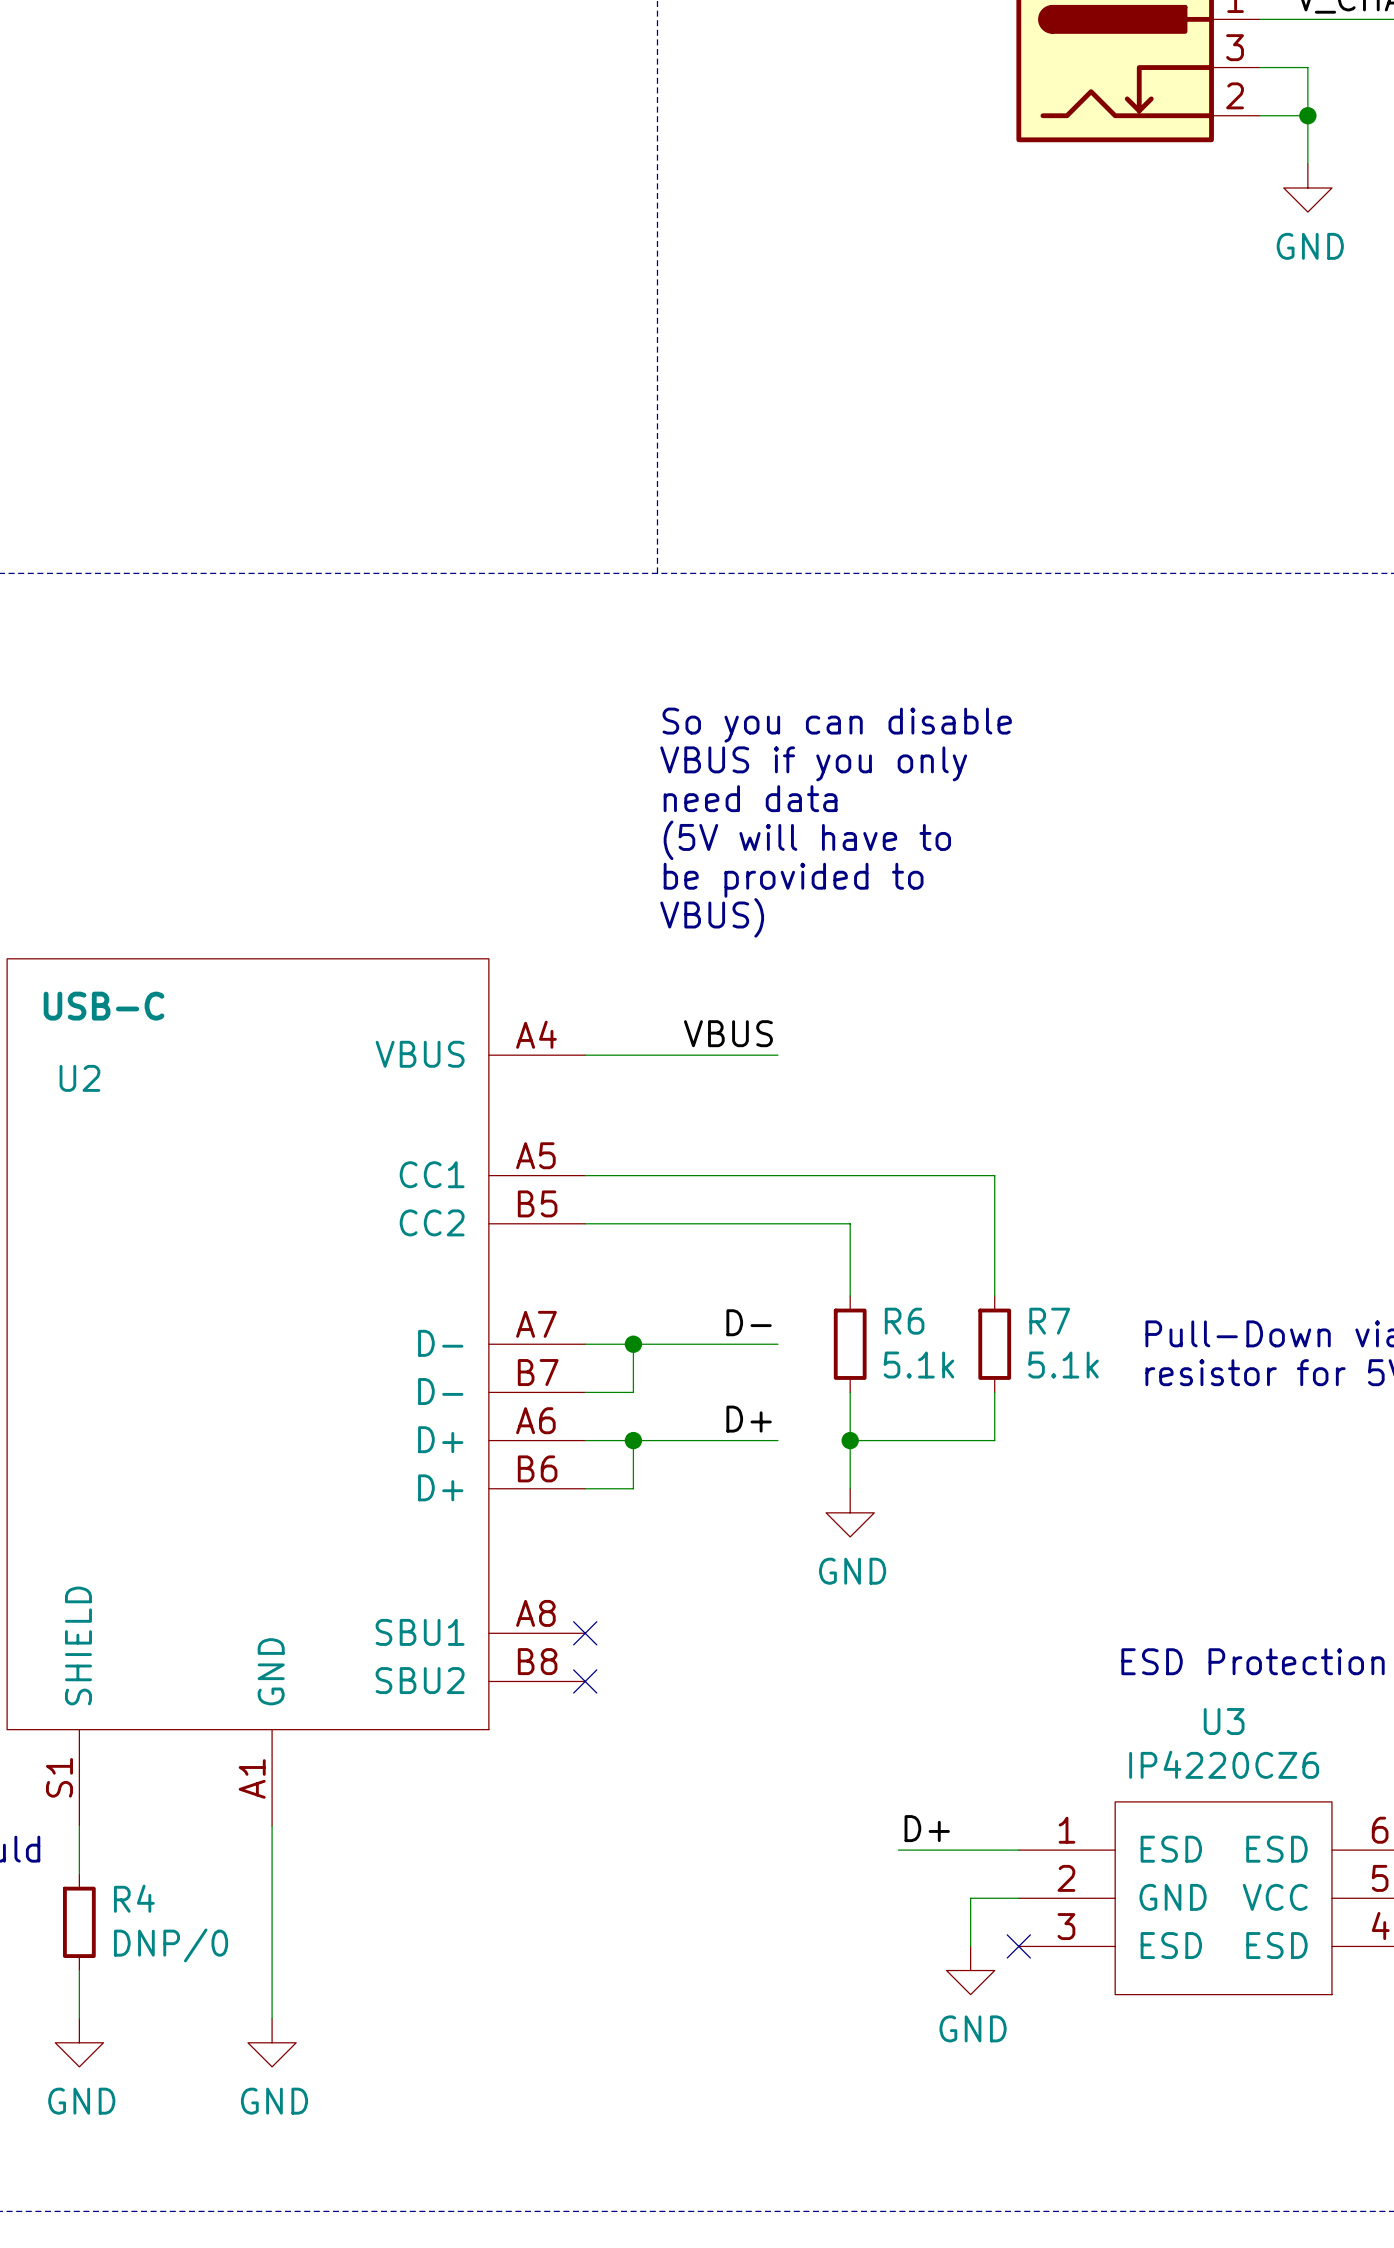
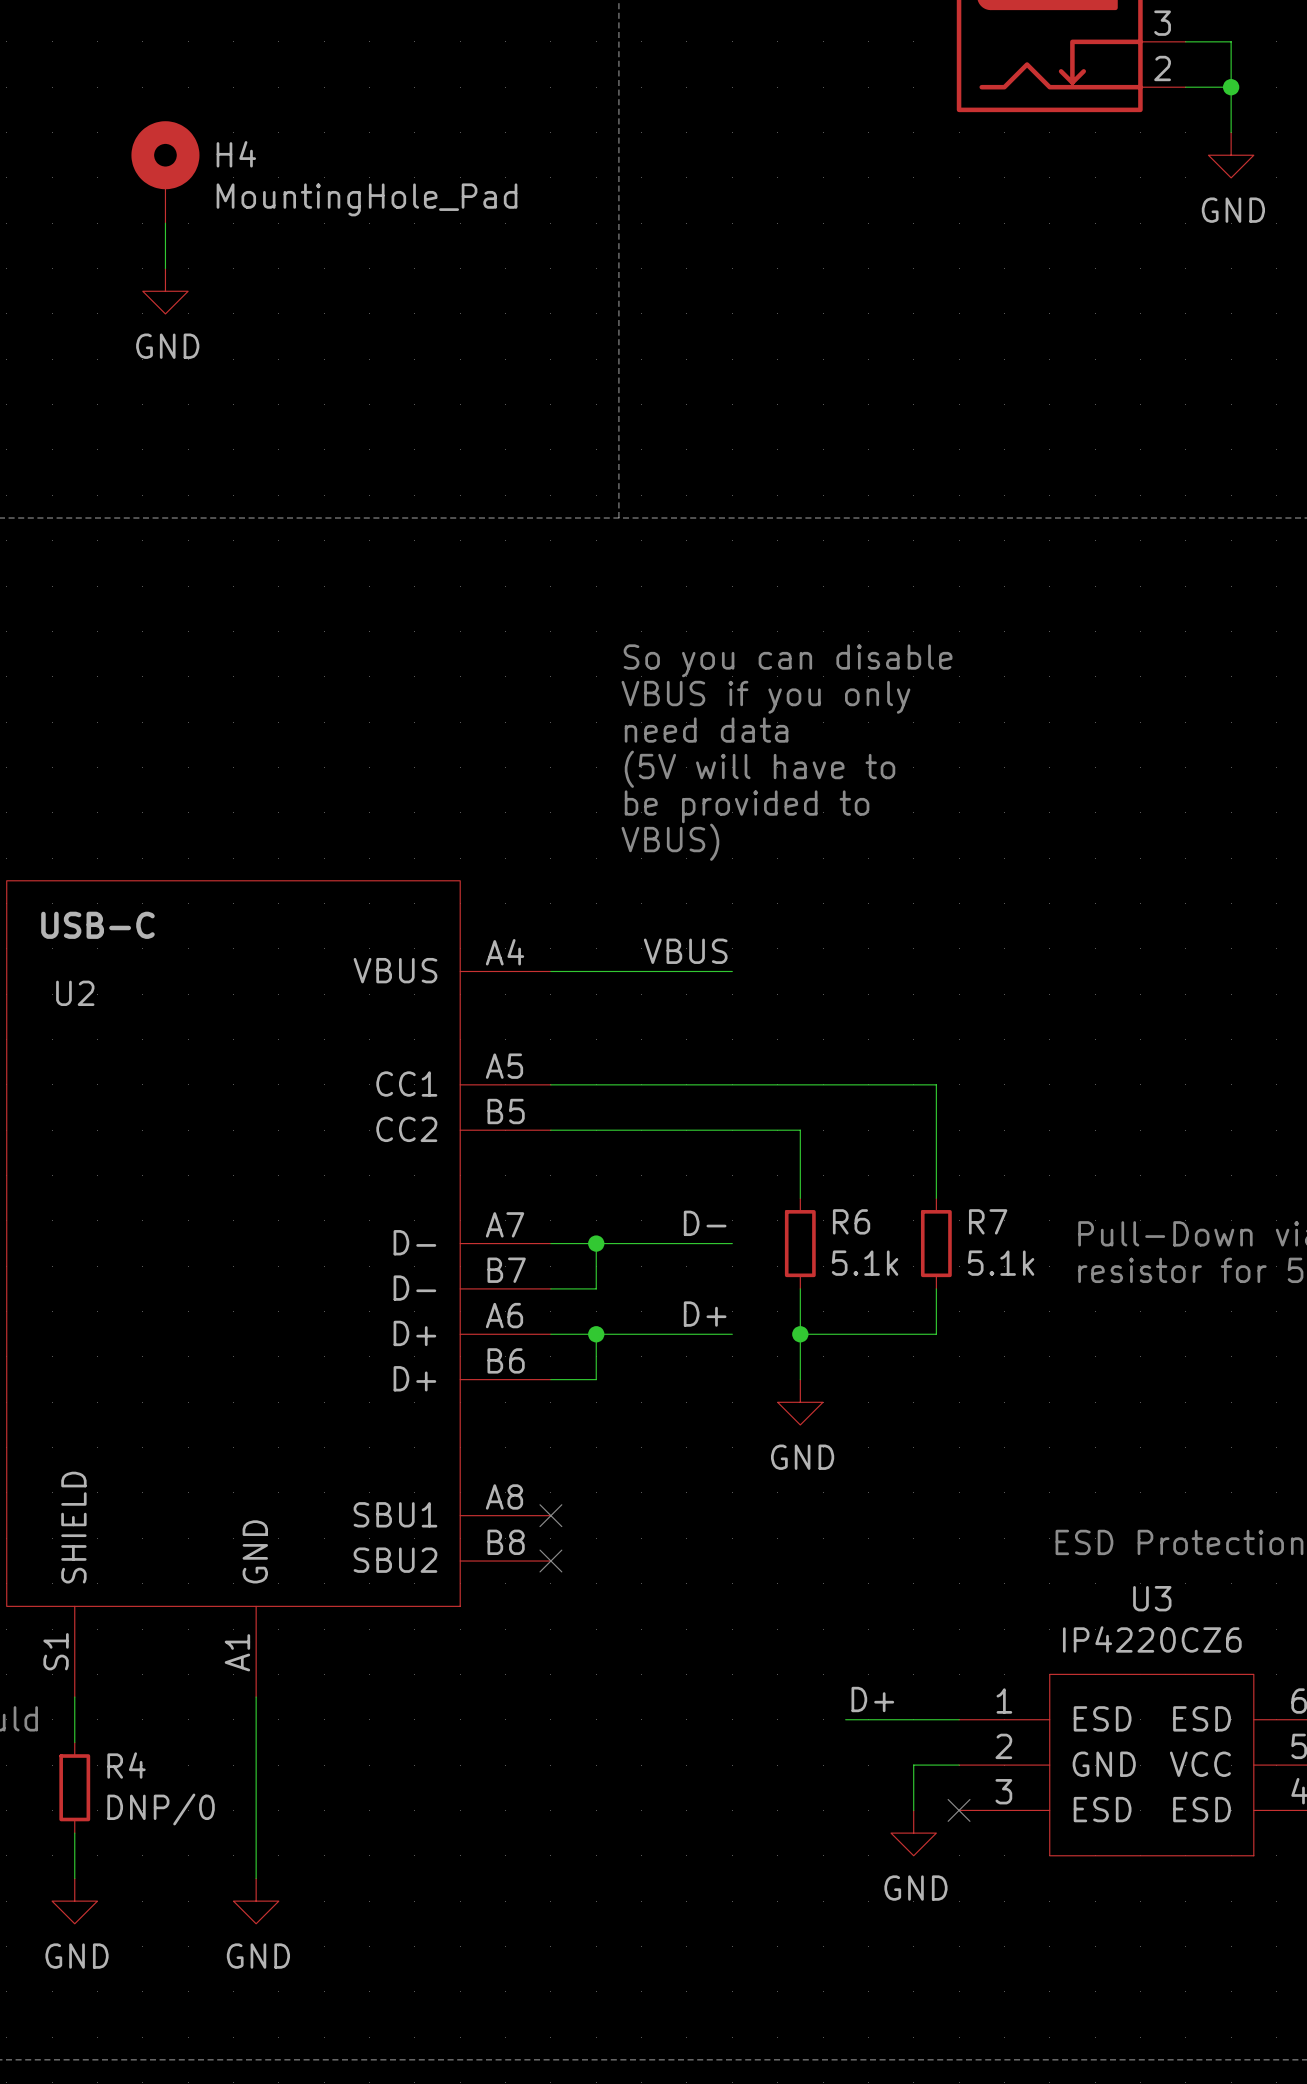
H4: none -> MountingHole_Pad (165, 172)
wire: none -> (165, 223) (165, 268)
power symbol: none -> GND (165, 291)

